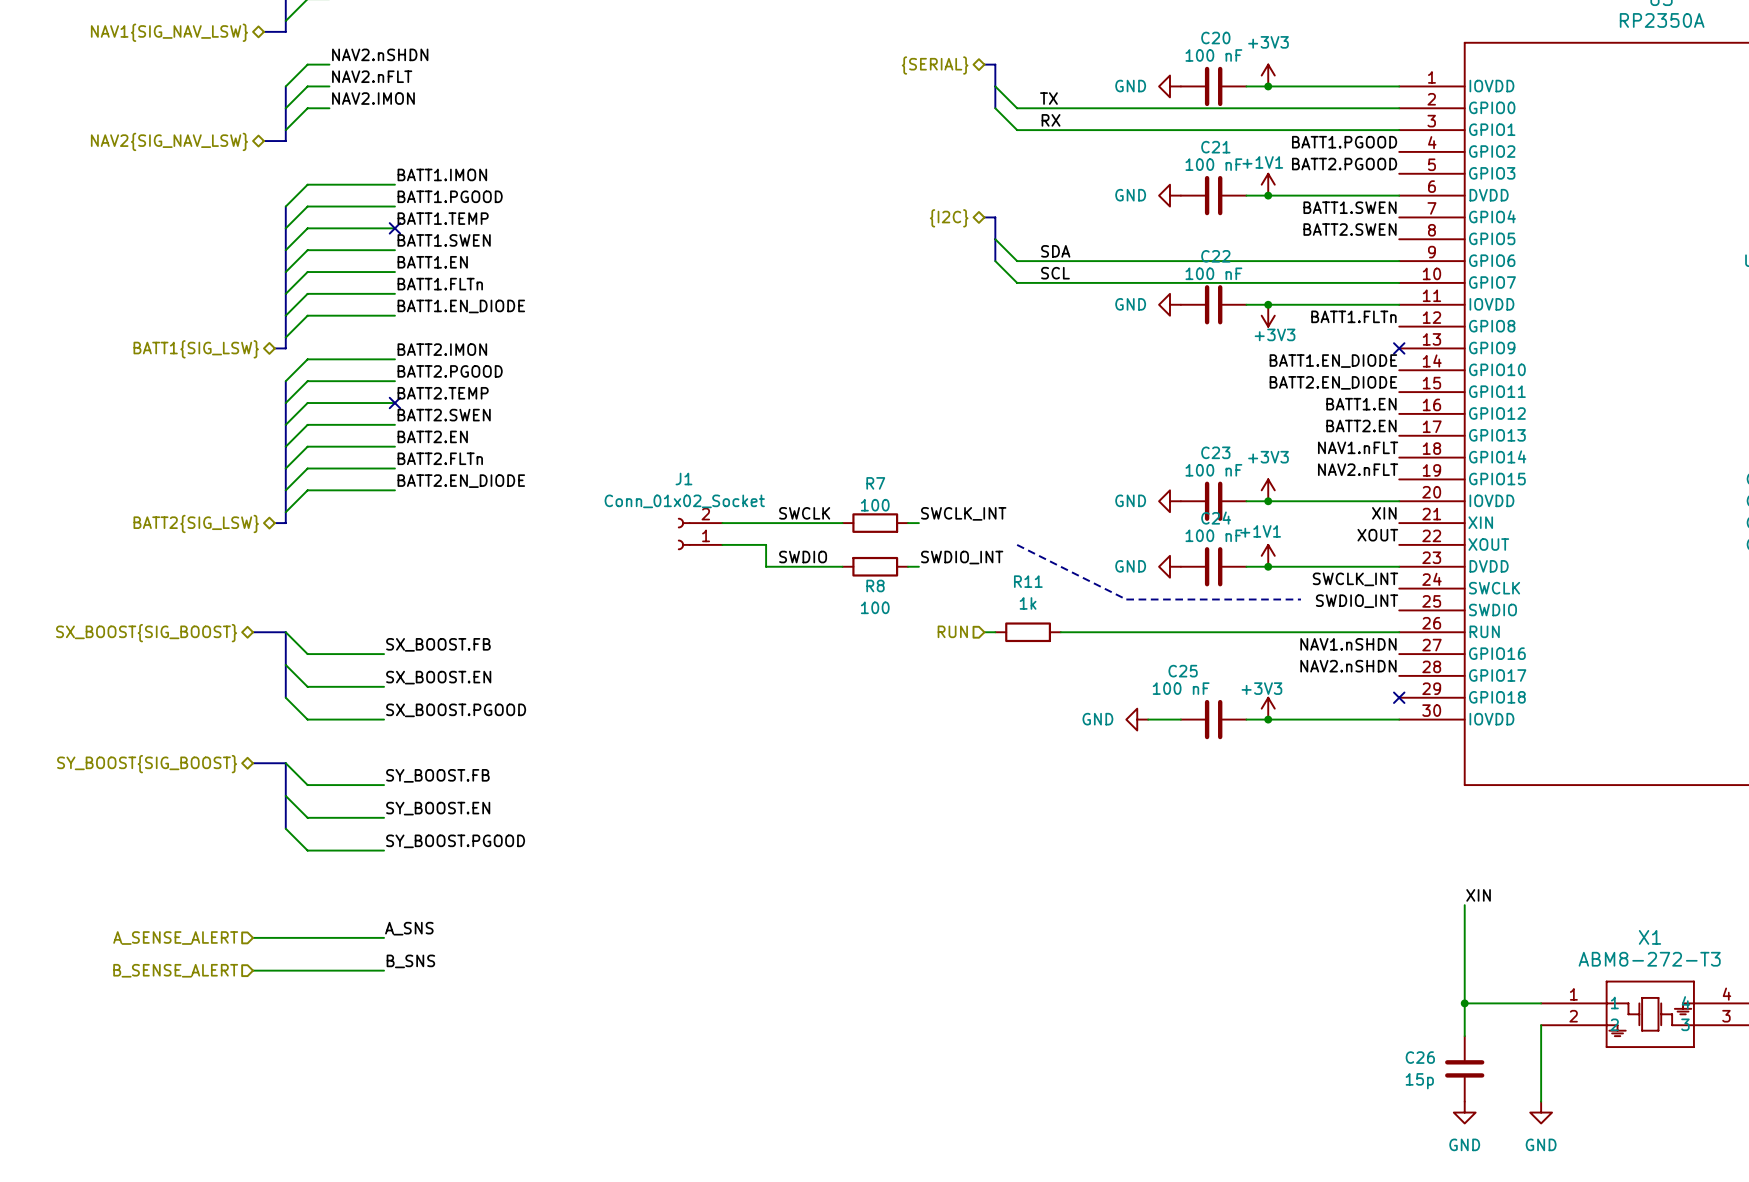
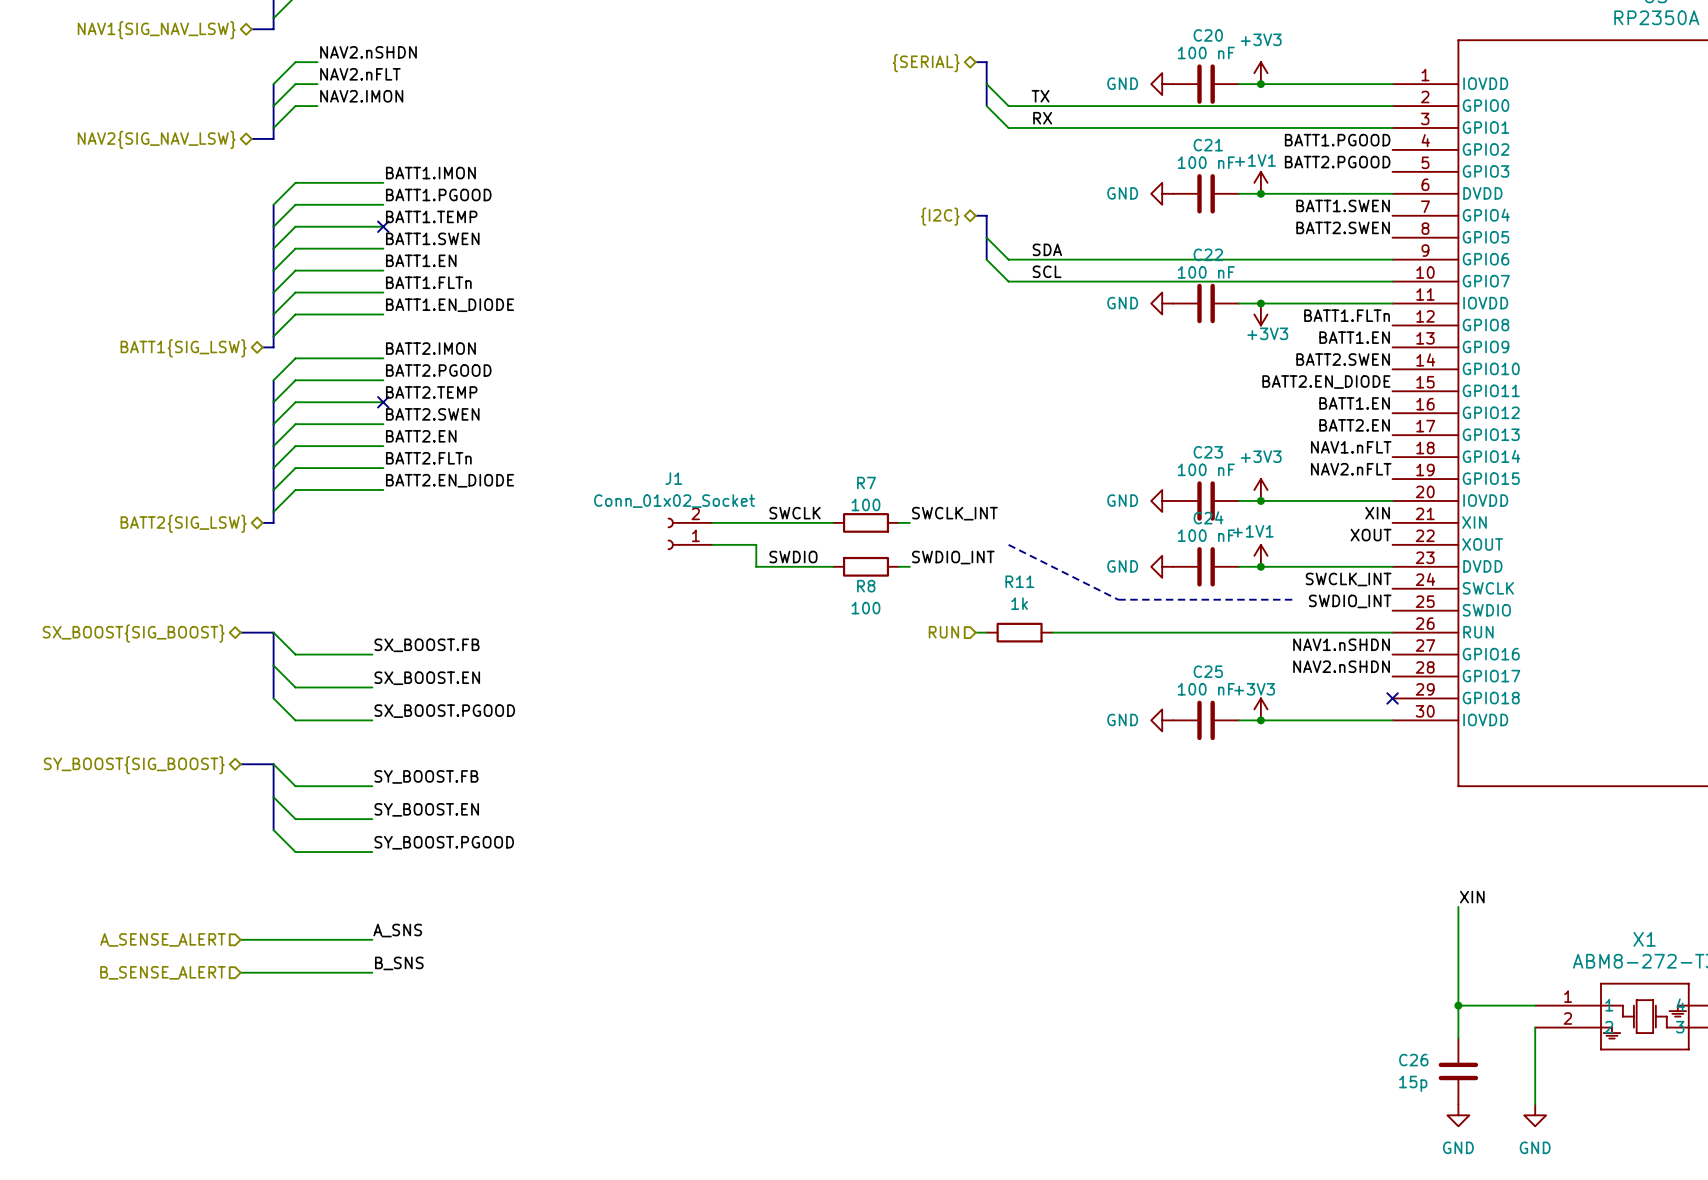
label: none -> BATT1.EN (1354, 337)
no-connect mark: (1399, 348) -> none
label: BATT1.EN_DIODE (1333, 361) -> BATT2.SWEN (1343, 359)
C25 name position: C25 (1183, 671) -> C25 (1208, 671)
C25 value position: 100 nF (1181, 688) -> 100 nF (1206, 689)
power symbol position: GND (1137, 719) -> GND (1162, 720)
wire: (1148, 719) (1180, 719) -> none

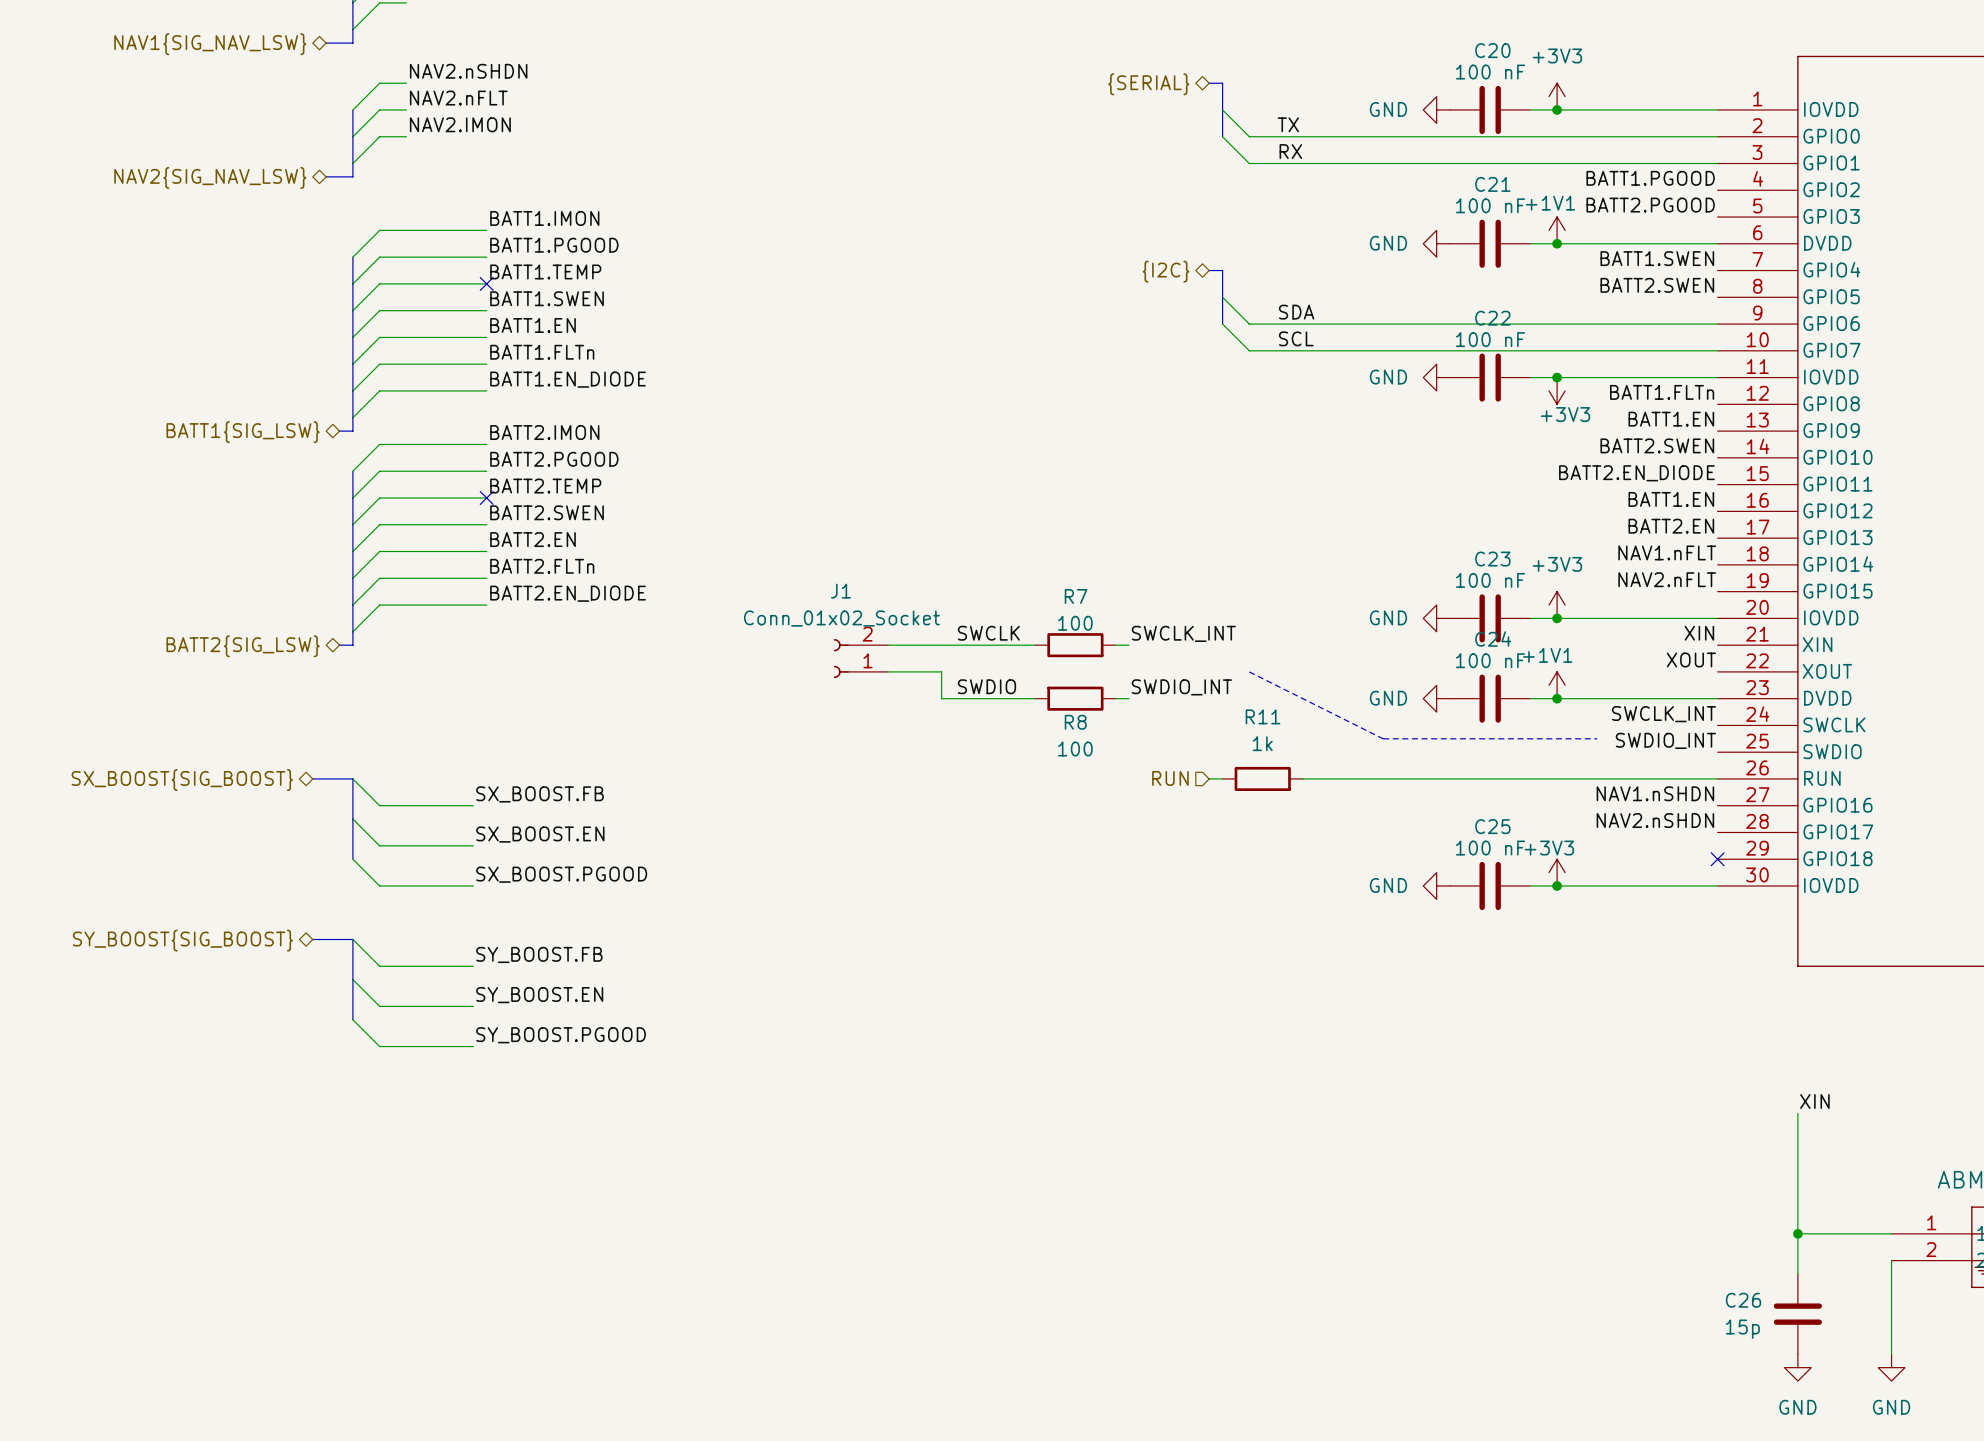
label: A_SNS (397, 930) -> none
hierarchical label: A_SENSE_ALERT (162, 939) -> none
wire: (240, 939) (372, 939) -> none
label: B_SNS (399, 963) -> none
hierarchical label: B_SENSE_ALERT (162, 972) -> none
wire: (240, 972) (372, 972) -> none

